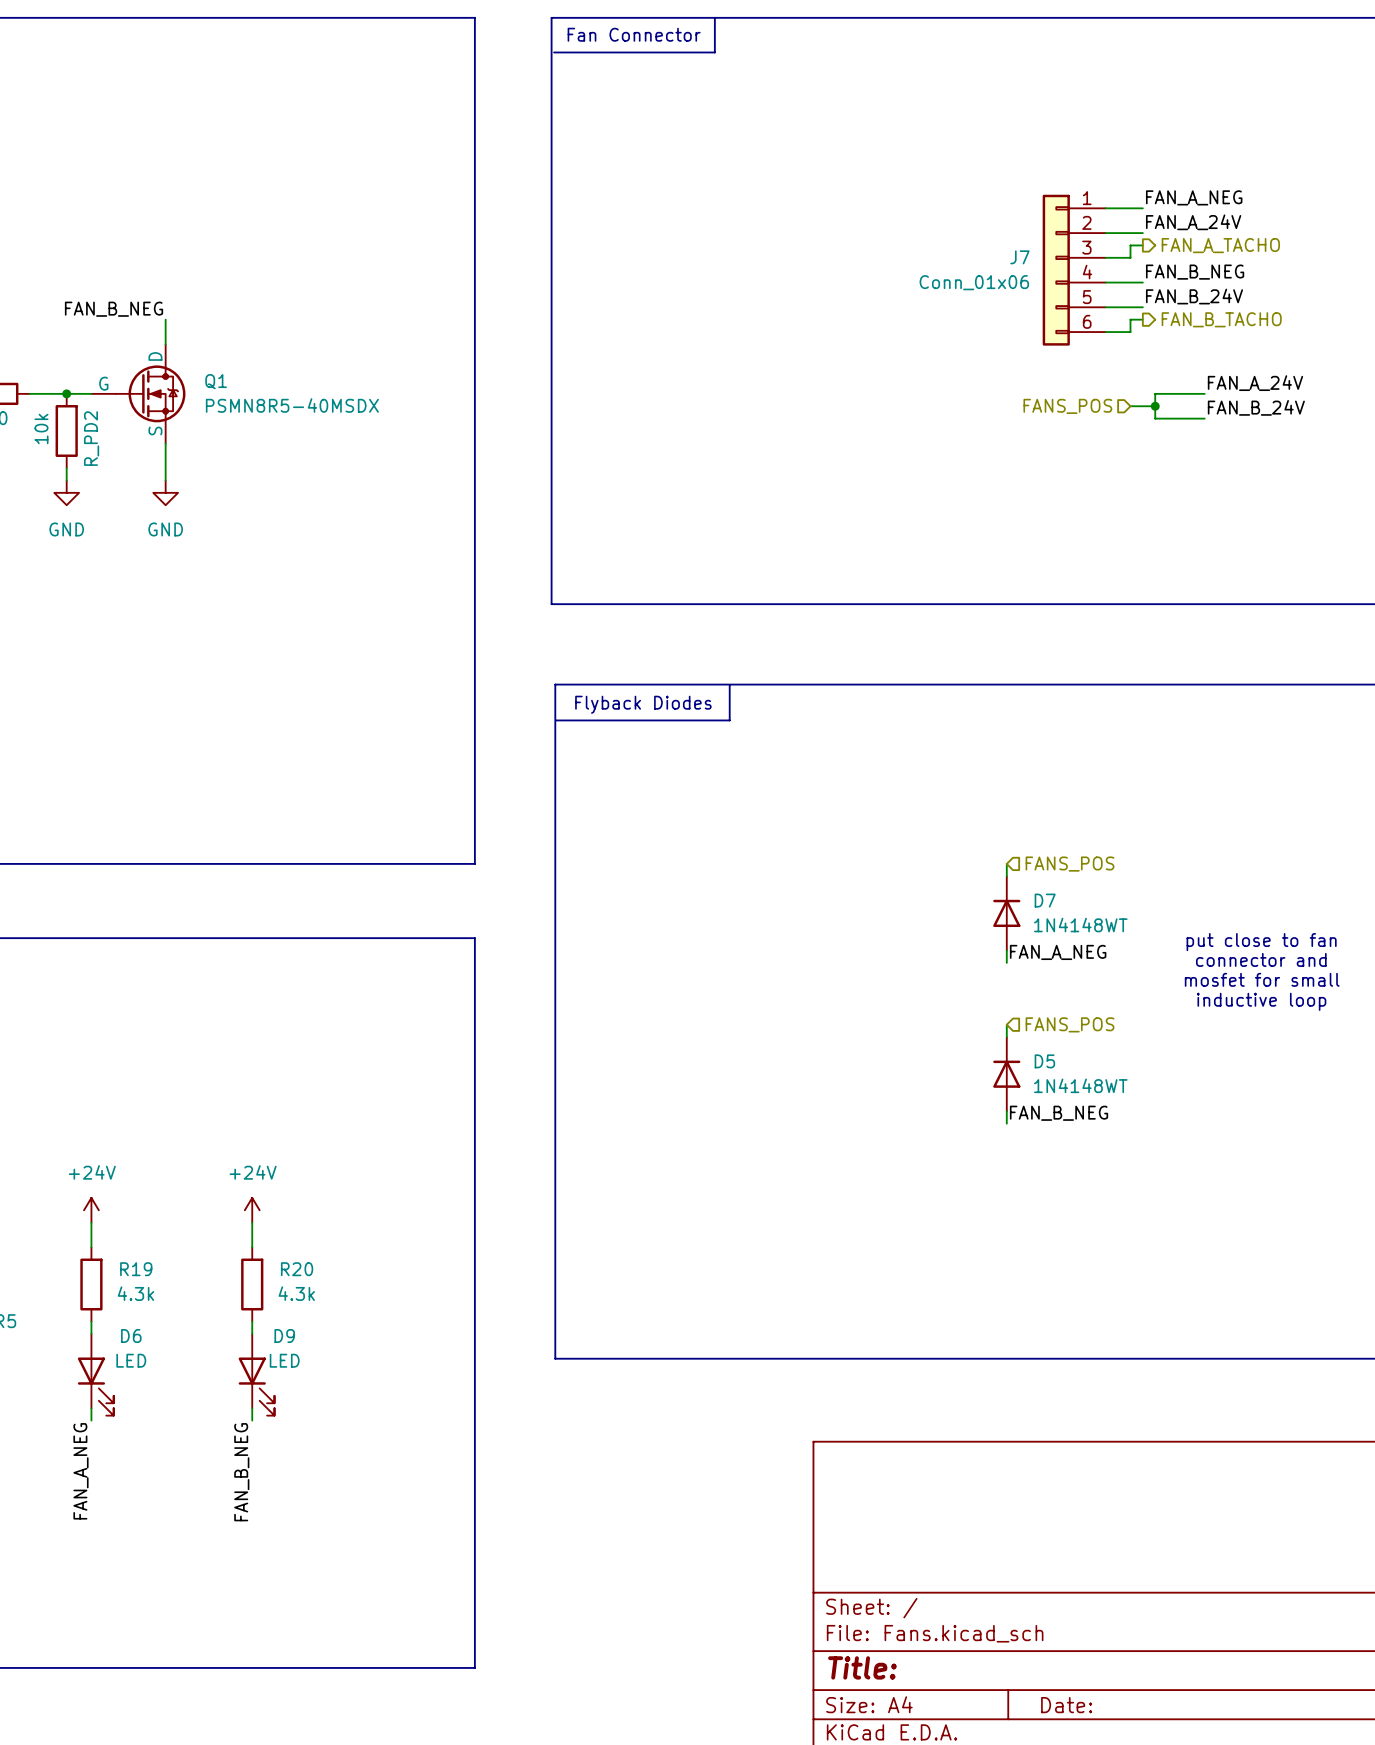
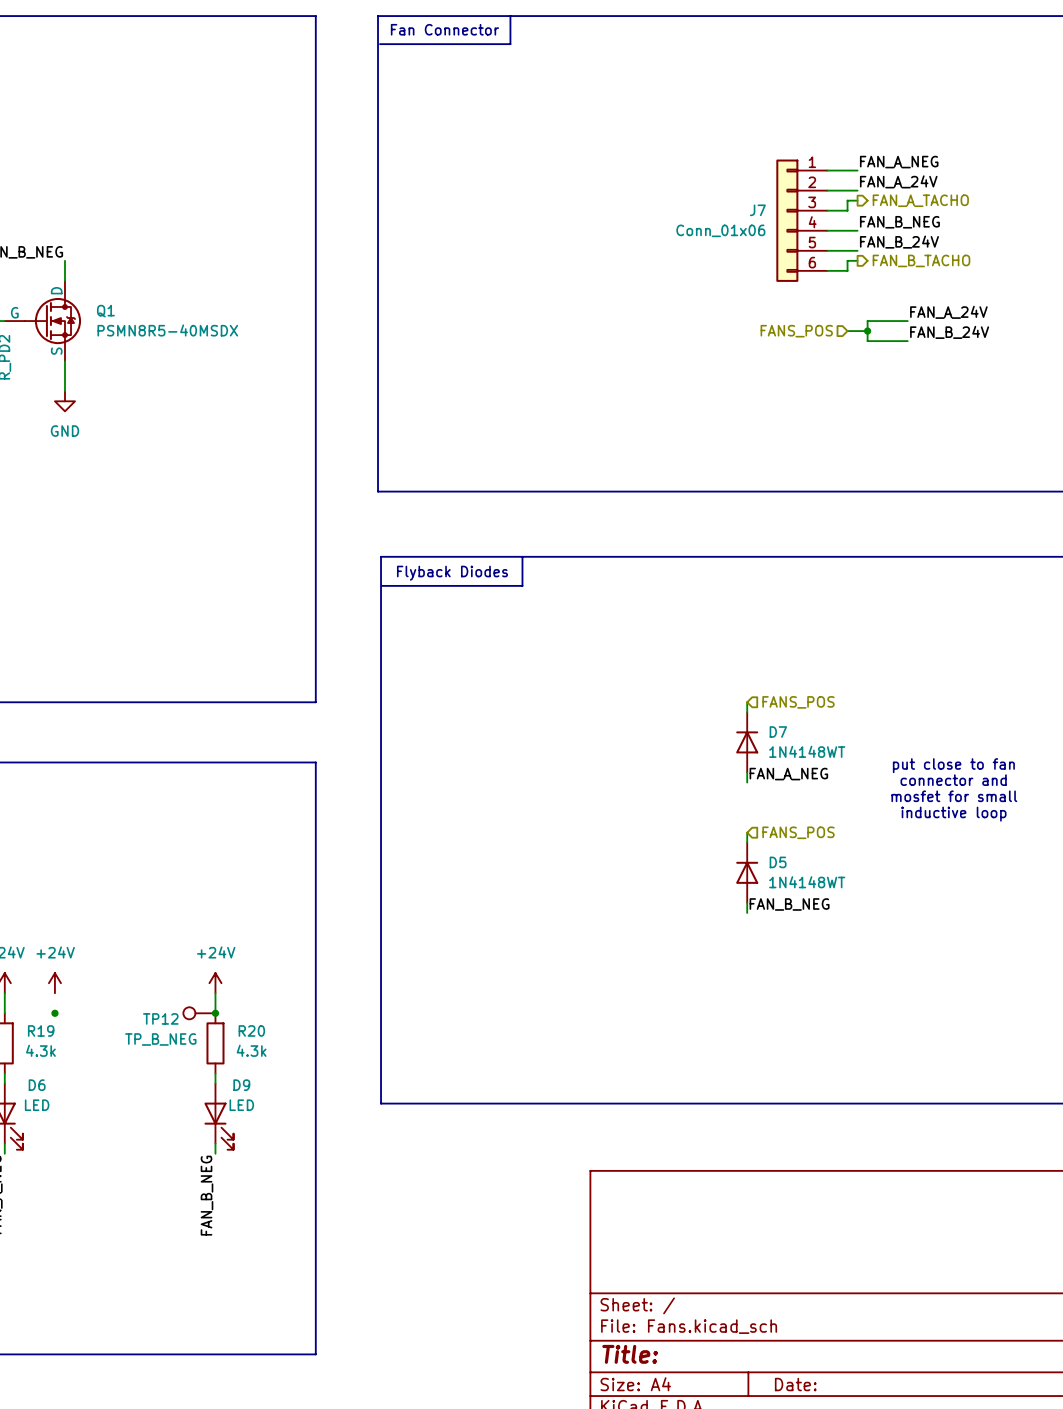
power symbol: none -> +24V (54, 983)
power symbol: +24V (252, 1210) -> none
power symbol: none -> +24V (215, 983)
wire: (252, 1222) (252, 1247) -> (215, 993) (215, 1013)
junction: none -> (54, 1013)
TP12: none -> TP_B_NEG (199, 1013)
junction: none -> (215, 1013)
R20 position: (252, 1284) -> (215, 1043)
wire: (252, 1321) (252, 1333) -> (215, 1073) (215, 1083)
D9 position: (256, 1374) -> (218, 1116)
wire: (252, 1408) (252, 1420) -> (215, 1143) (215, 1153)
label position: FAN_B_NEG (241, 1472) -> FAN_B_NEG (207, 1195)

